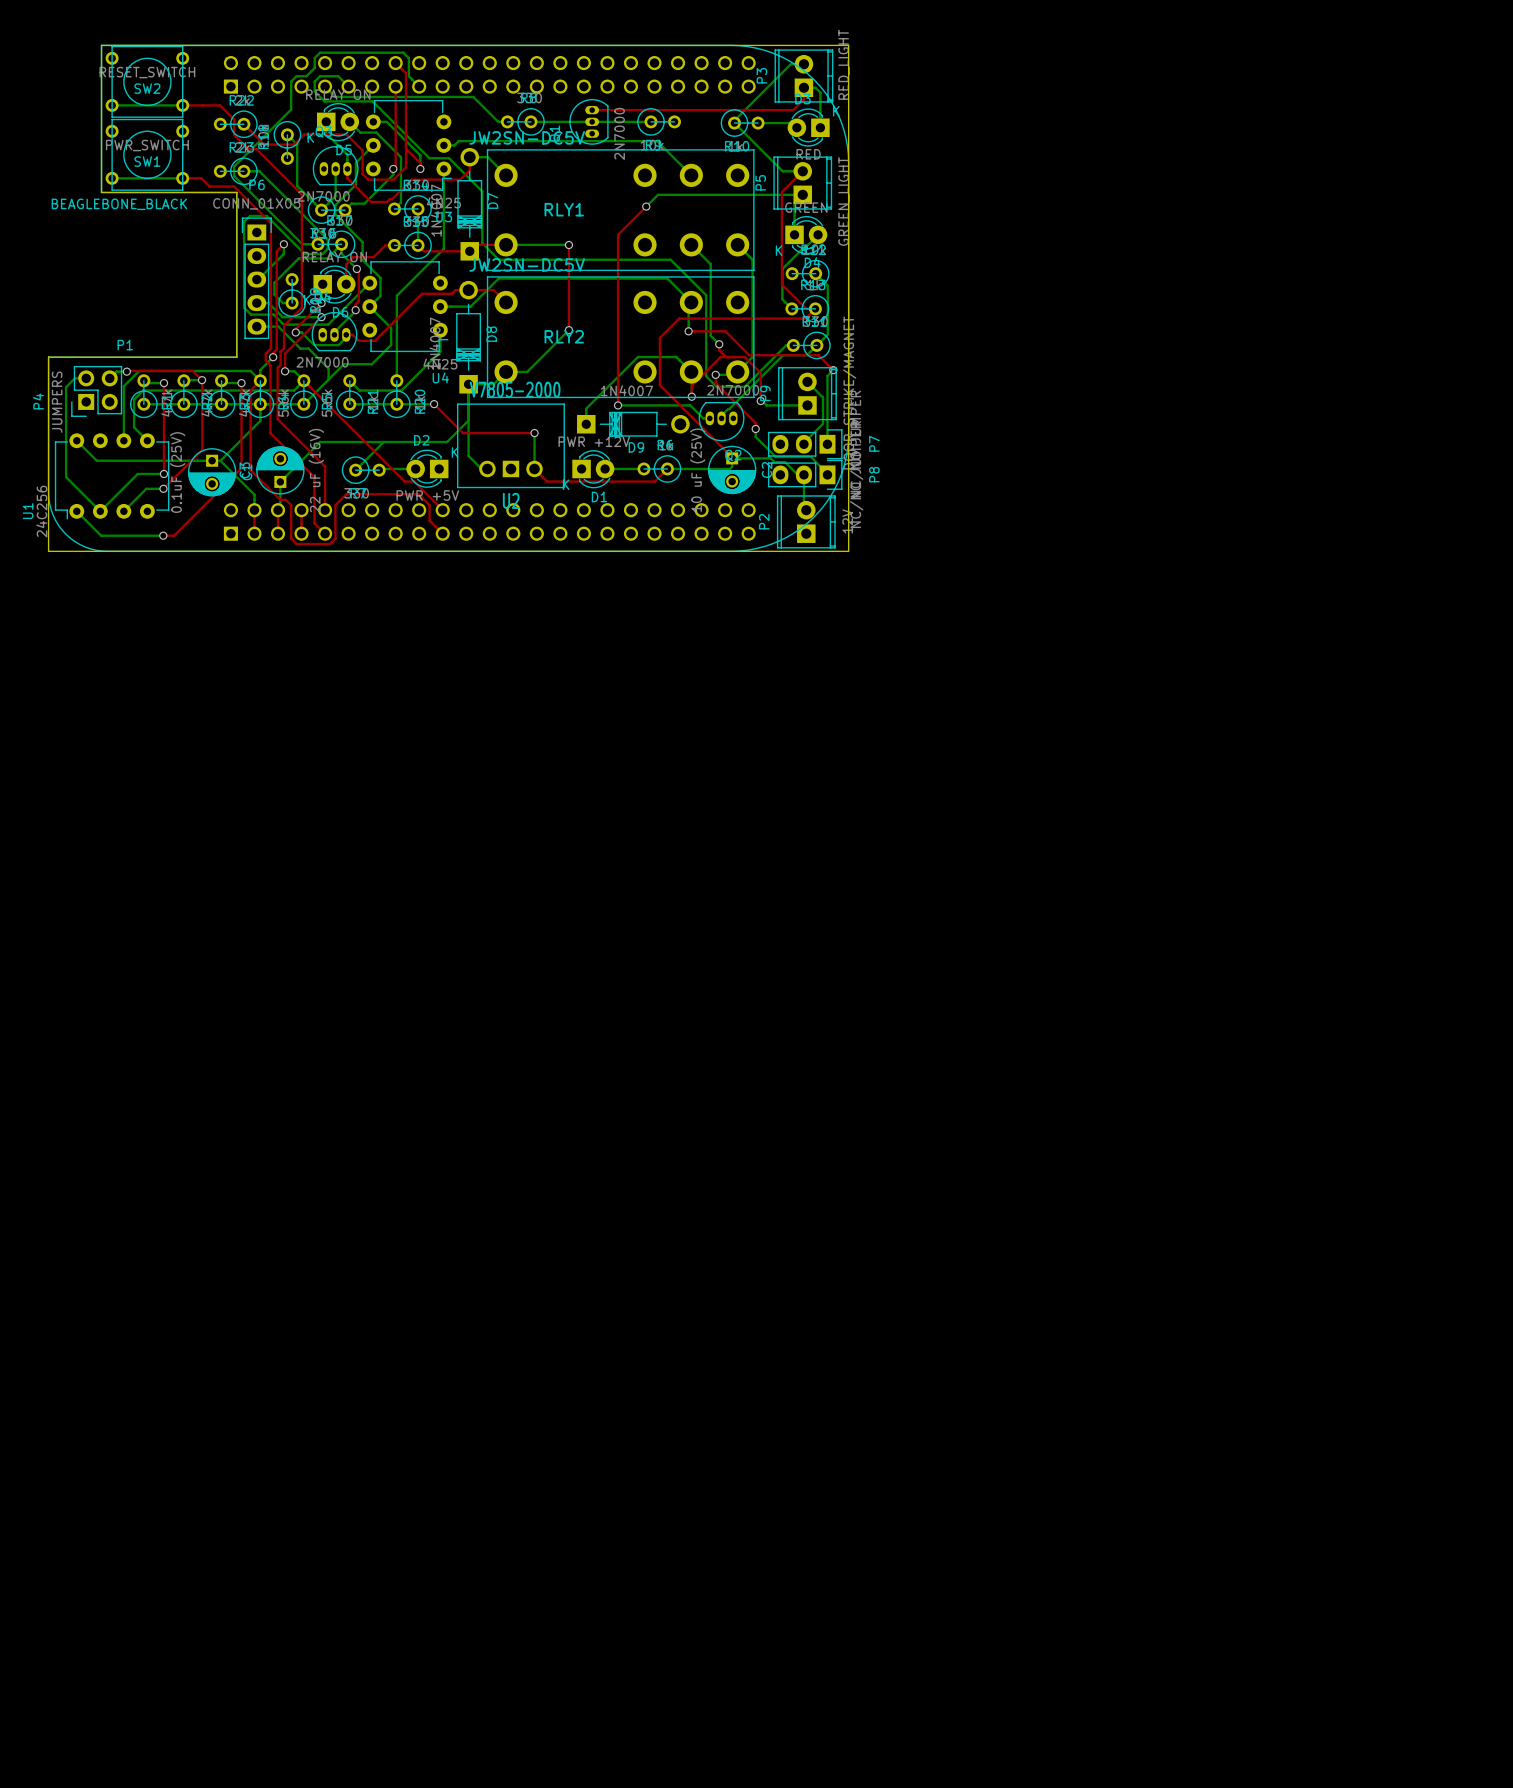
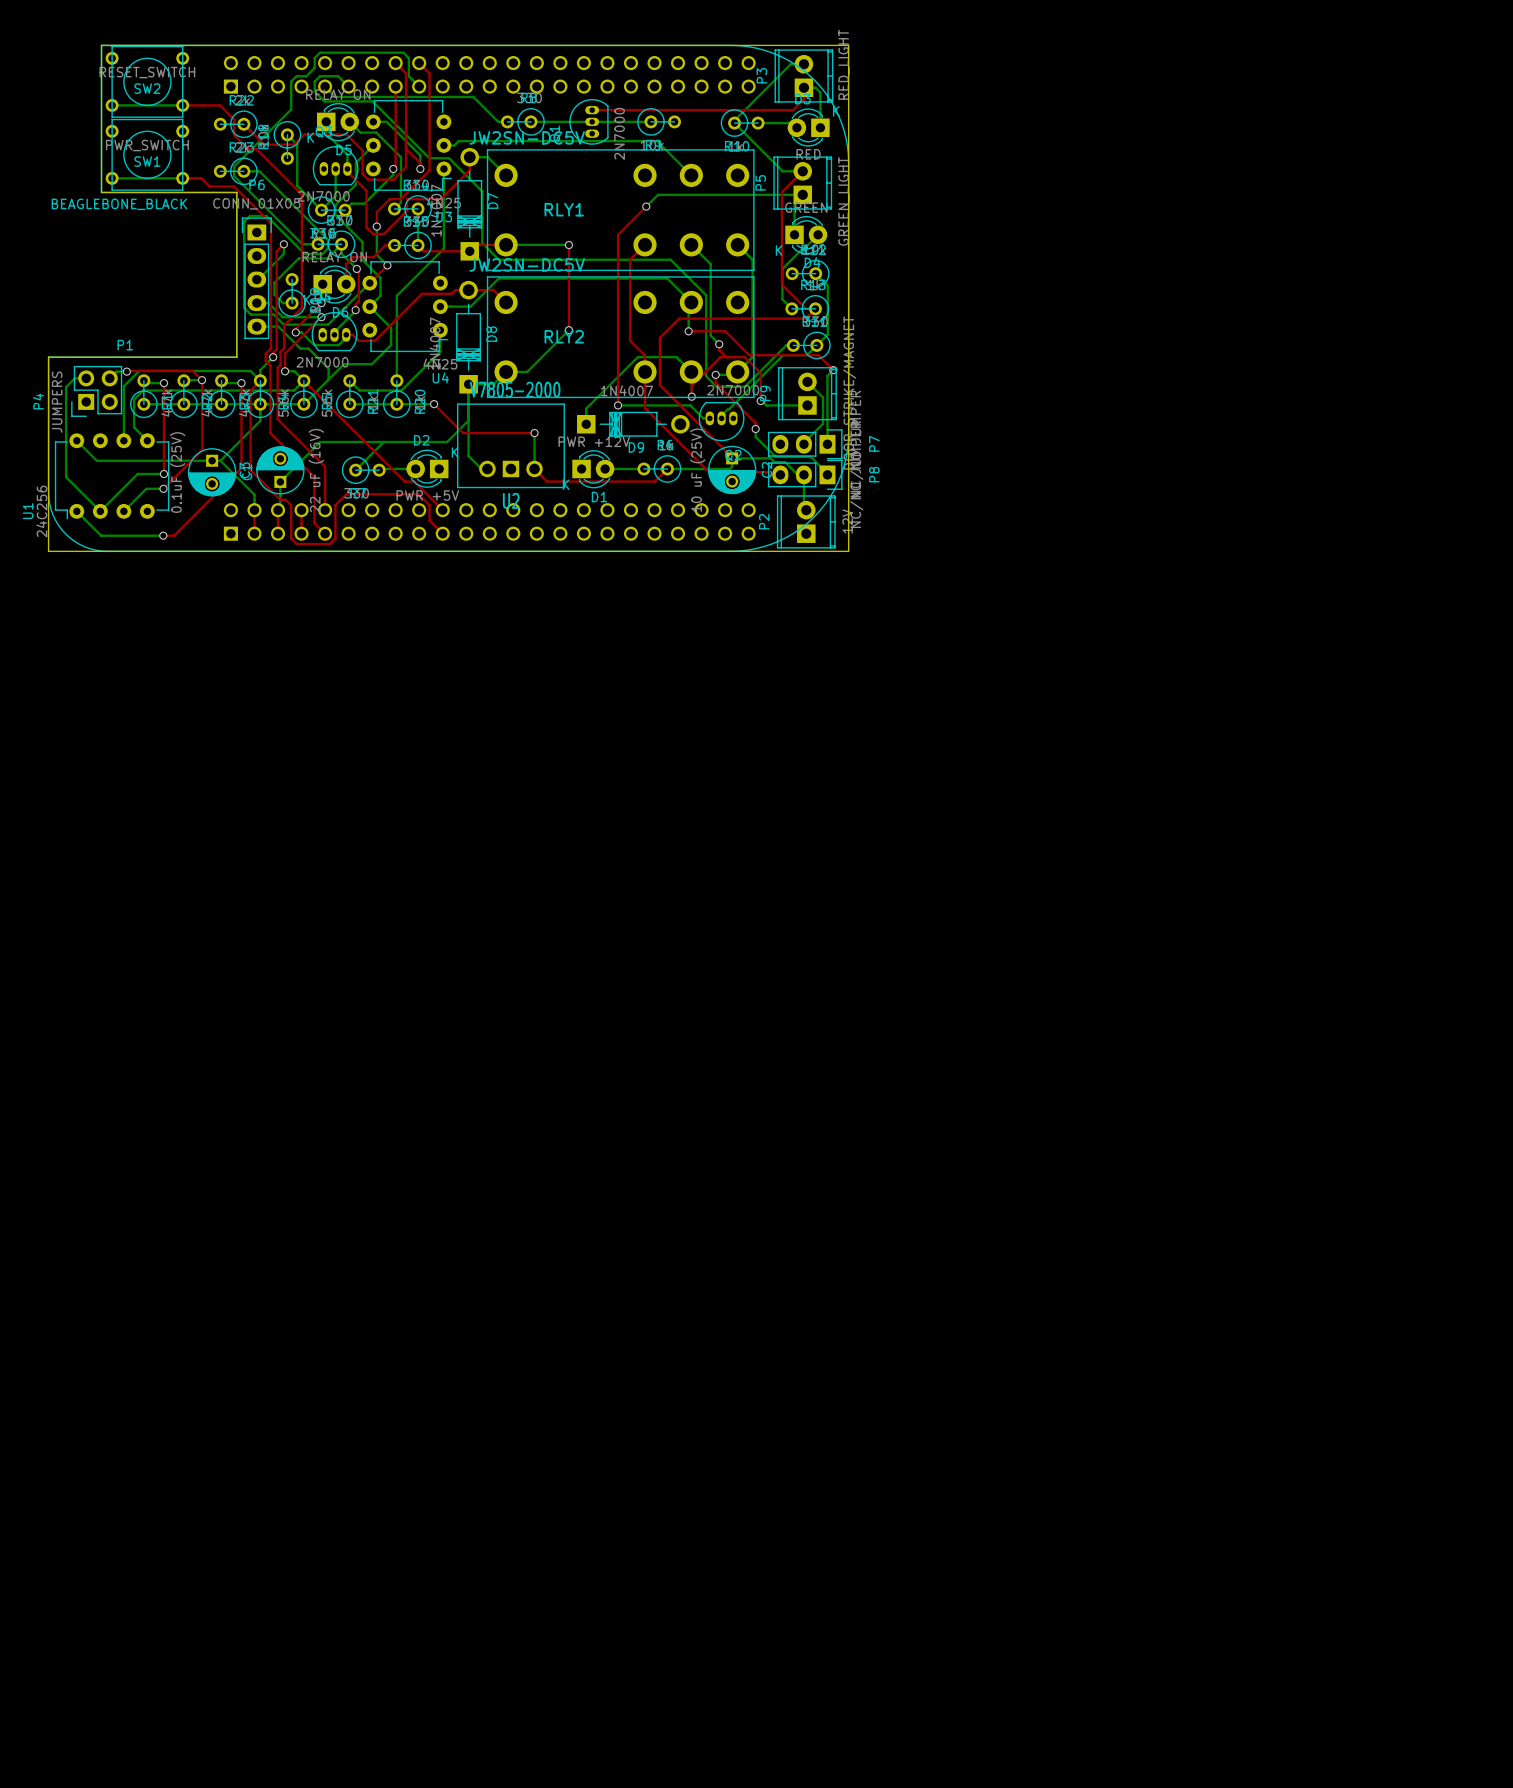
top track: none -> (419, 63) (429, 73) (429, 170) (400, 199) (392, 199)
top track: (347, 171) (347, 178) (371, 202) (386, 202) -> (376, 226) (376, 212) (386, 202)
top track: (460, 179) (411, 179) (392, 199) -> (460, 179) (440, 199) (407, 199) (407, 210) (383, 234) (373, 234) (366, 227) (366, 190) (347, 171)
bottom track: none -> (376, 226) (376, 254) (387, 265)
via: none -> (376, 226)
top track: none -> (645, 244) (630, 259) (630, 340) (645, 355) (645, 408) (709, 472) (767, 472) (770, 474) (780, 474)
top track: none -> (387, 265) (369, 283)
via: none -> (387, 265)

